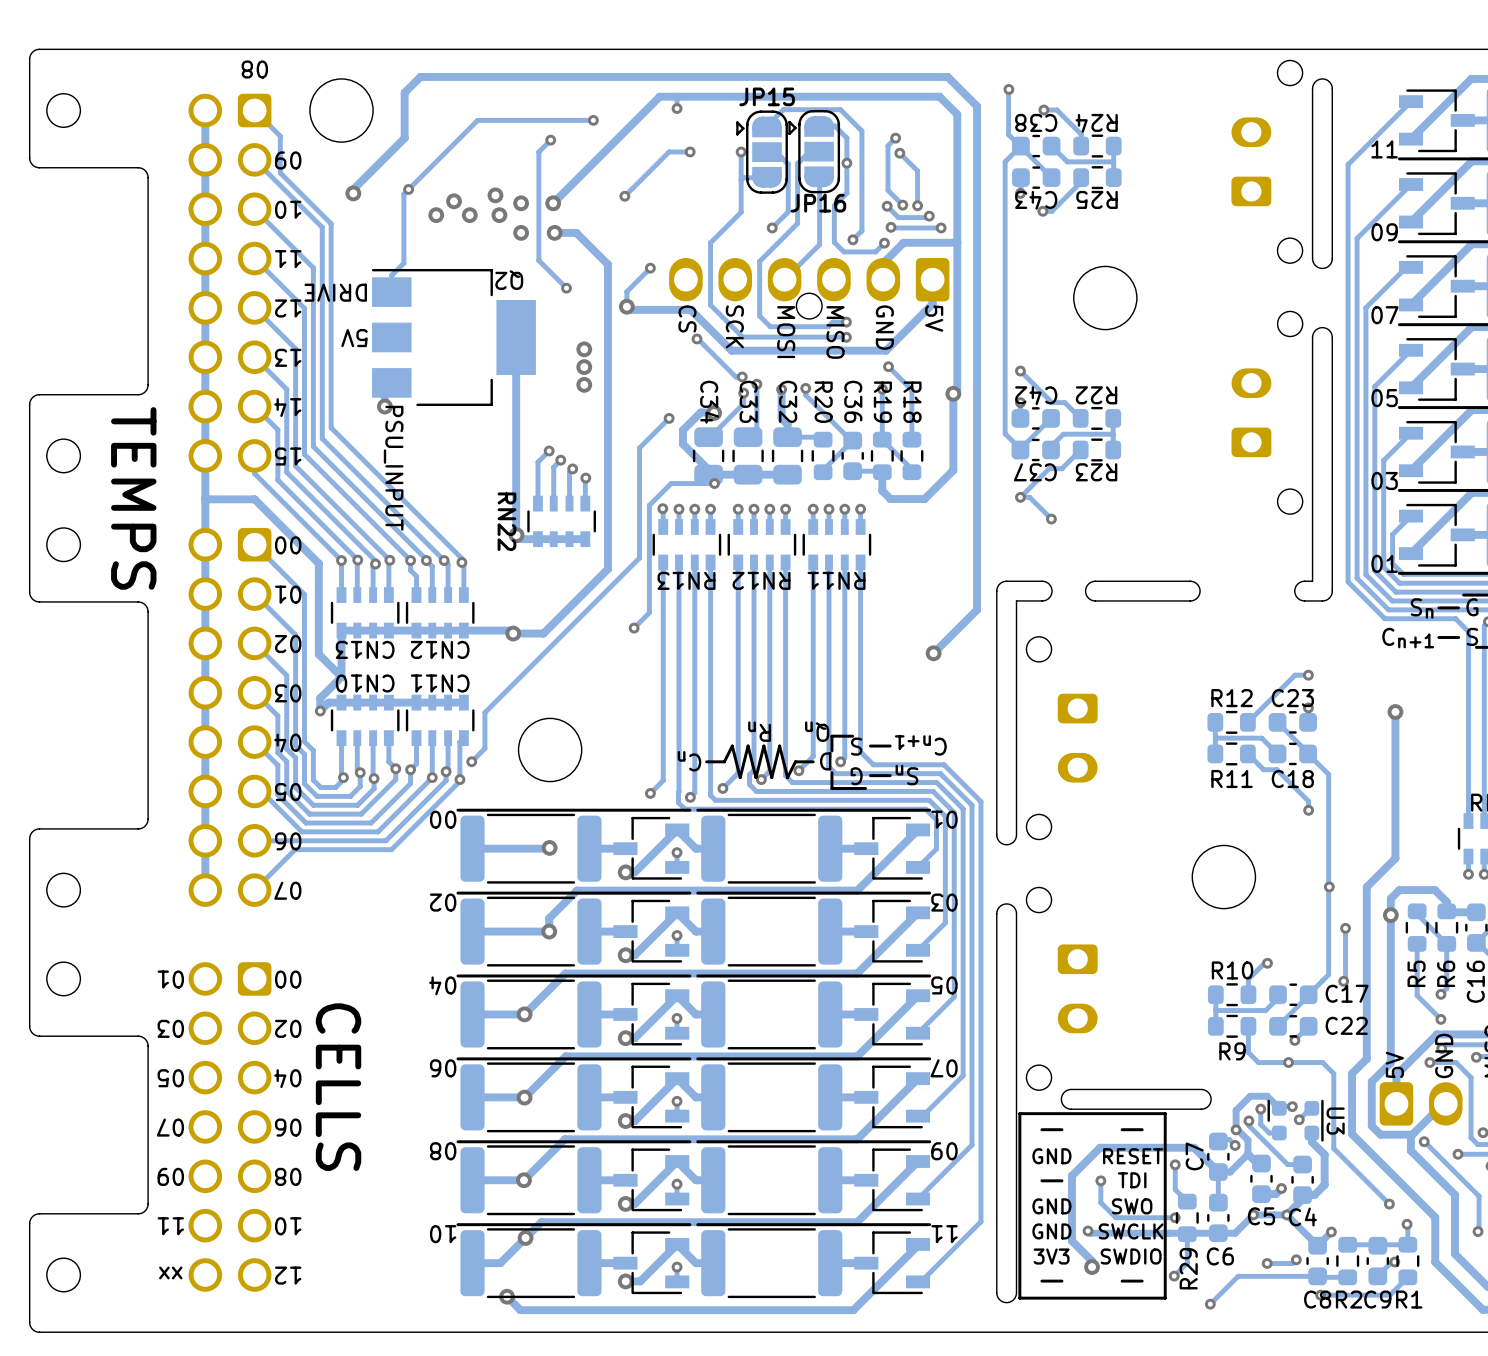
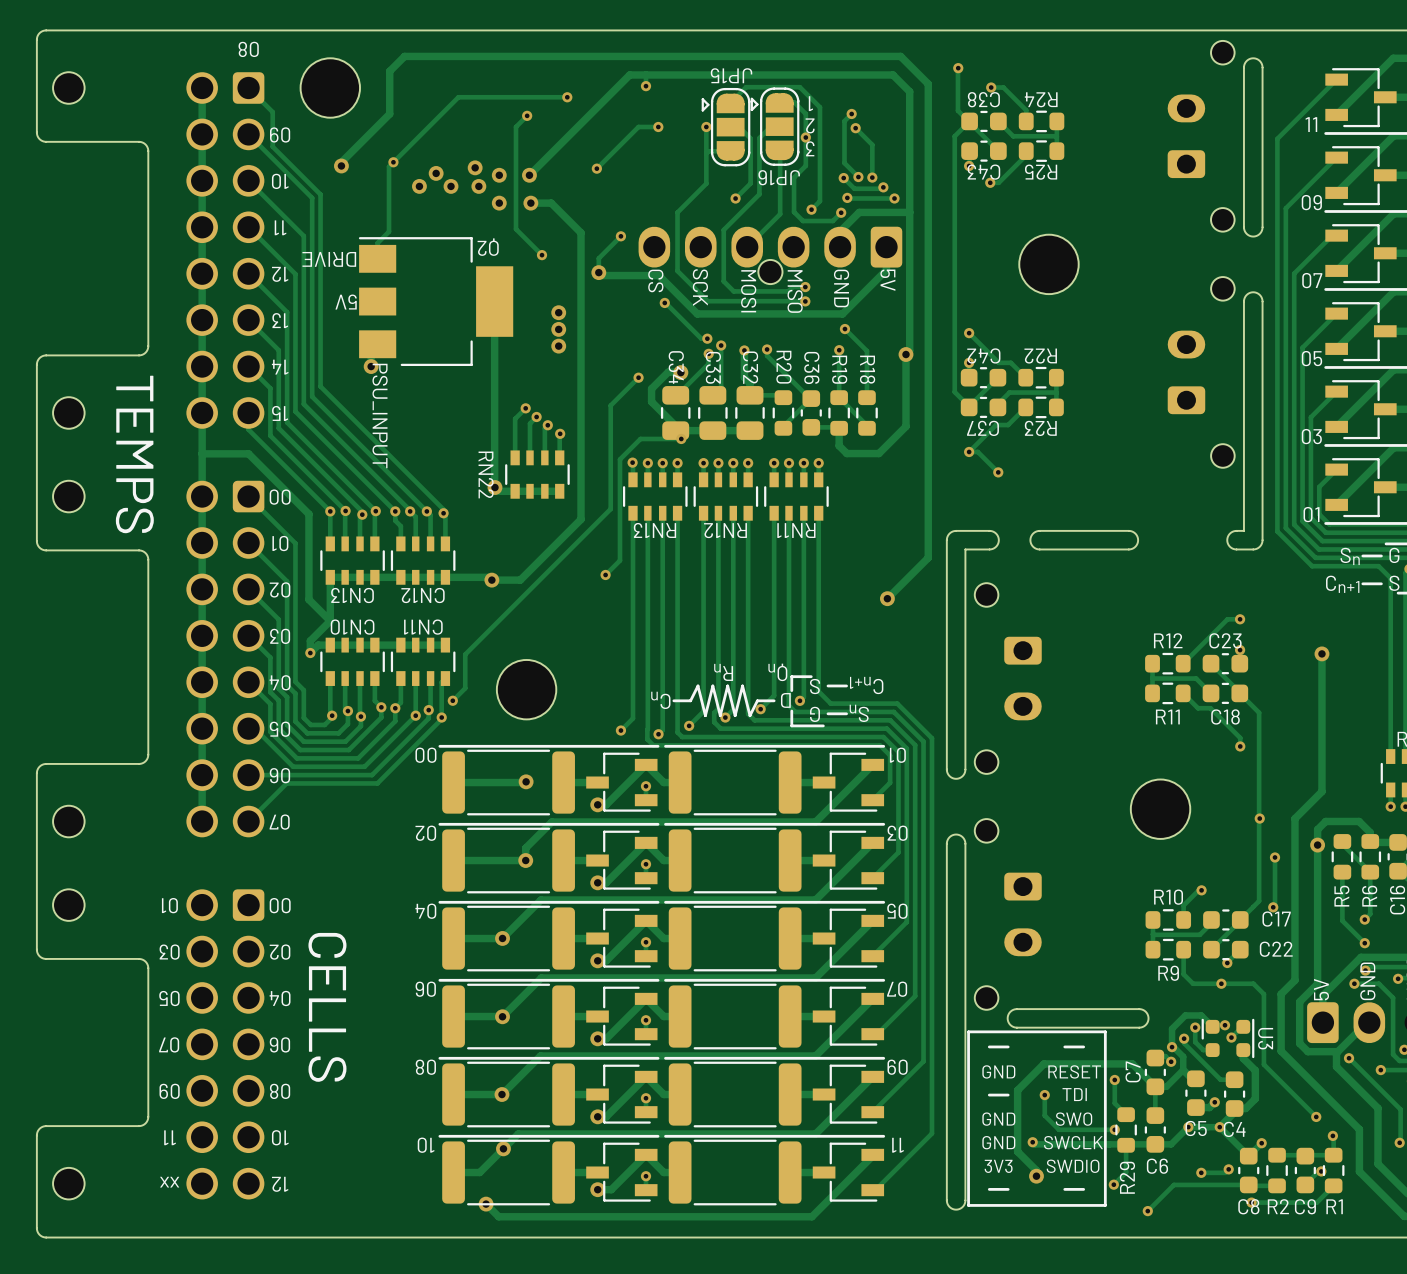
JP15 name rotation: 0° (767, 96) -> 180° (731, 75)
text: none -> 1 (810, 103)
text: none -> 2 (810, 125)
text: none -> 3 (810, 148)
JP16 name rotation: 0° (818, 203) -> 180° (779, 177)

